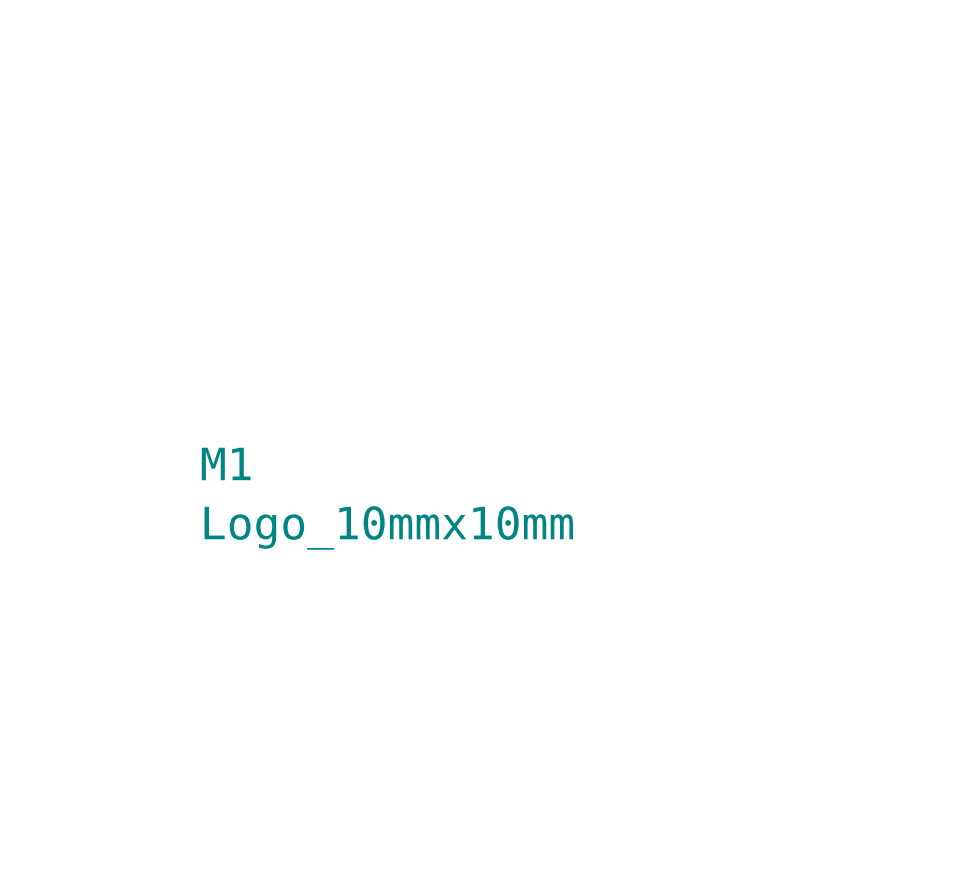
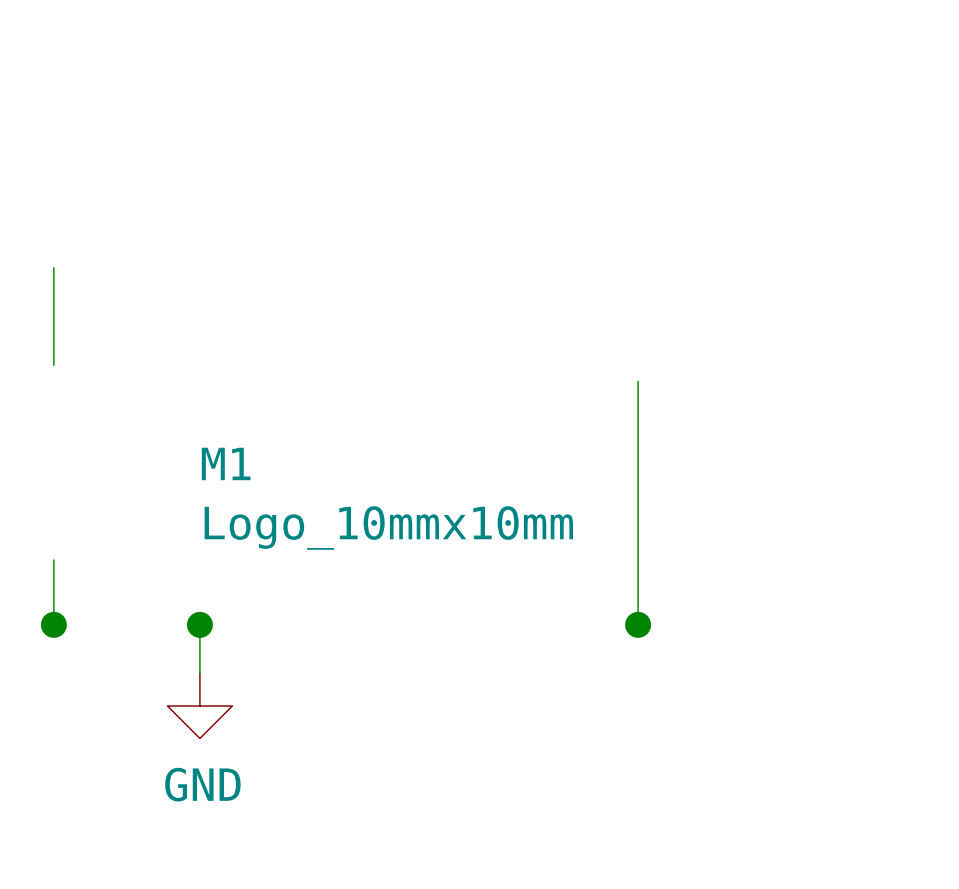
wire: none -> (53, 267) (53, 365)
wire: none -> (638, 381) (638, 624)
wire: none -> (53, 559) (53, 624)
junction: none -> (53, 624)
wire: none -> (199, 624) (199, 673)
junction: none -> (199, 624)
junction: none -> (638, 624)
power symbol: none -> GND (199, 706)

